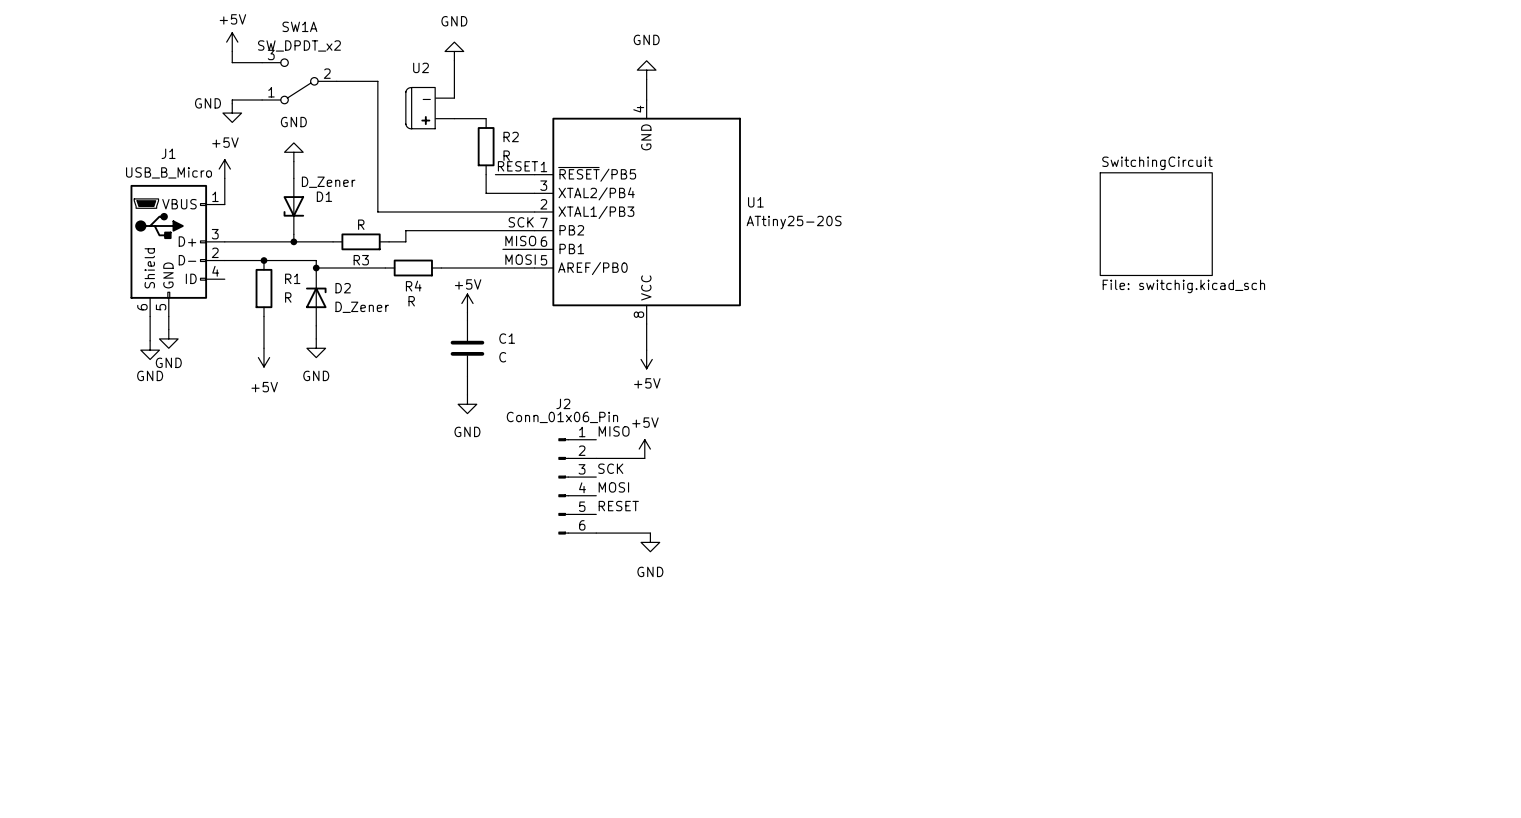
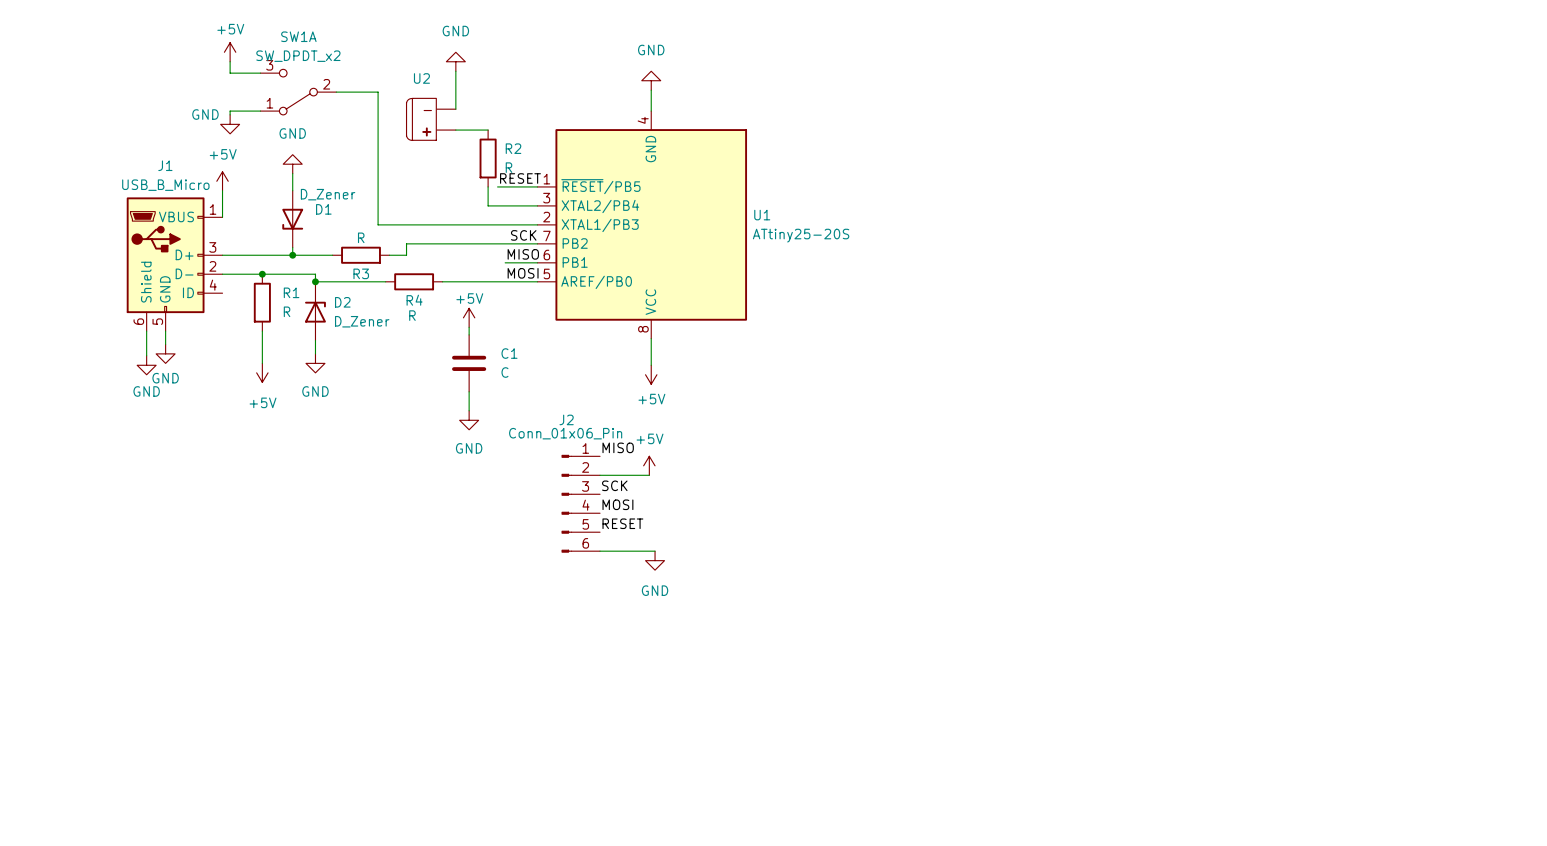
sheet SwitchingCircuit: File: switchig.kicad_sch (1156, 224) -> none

